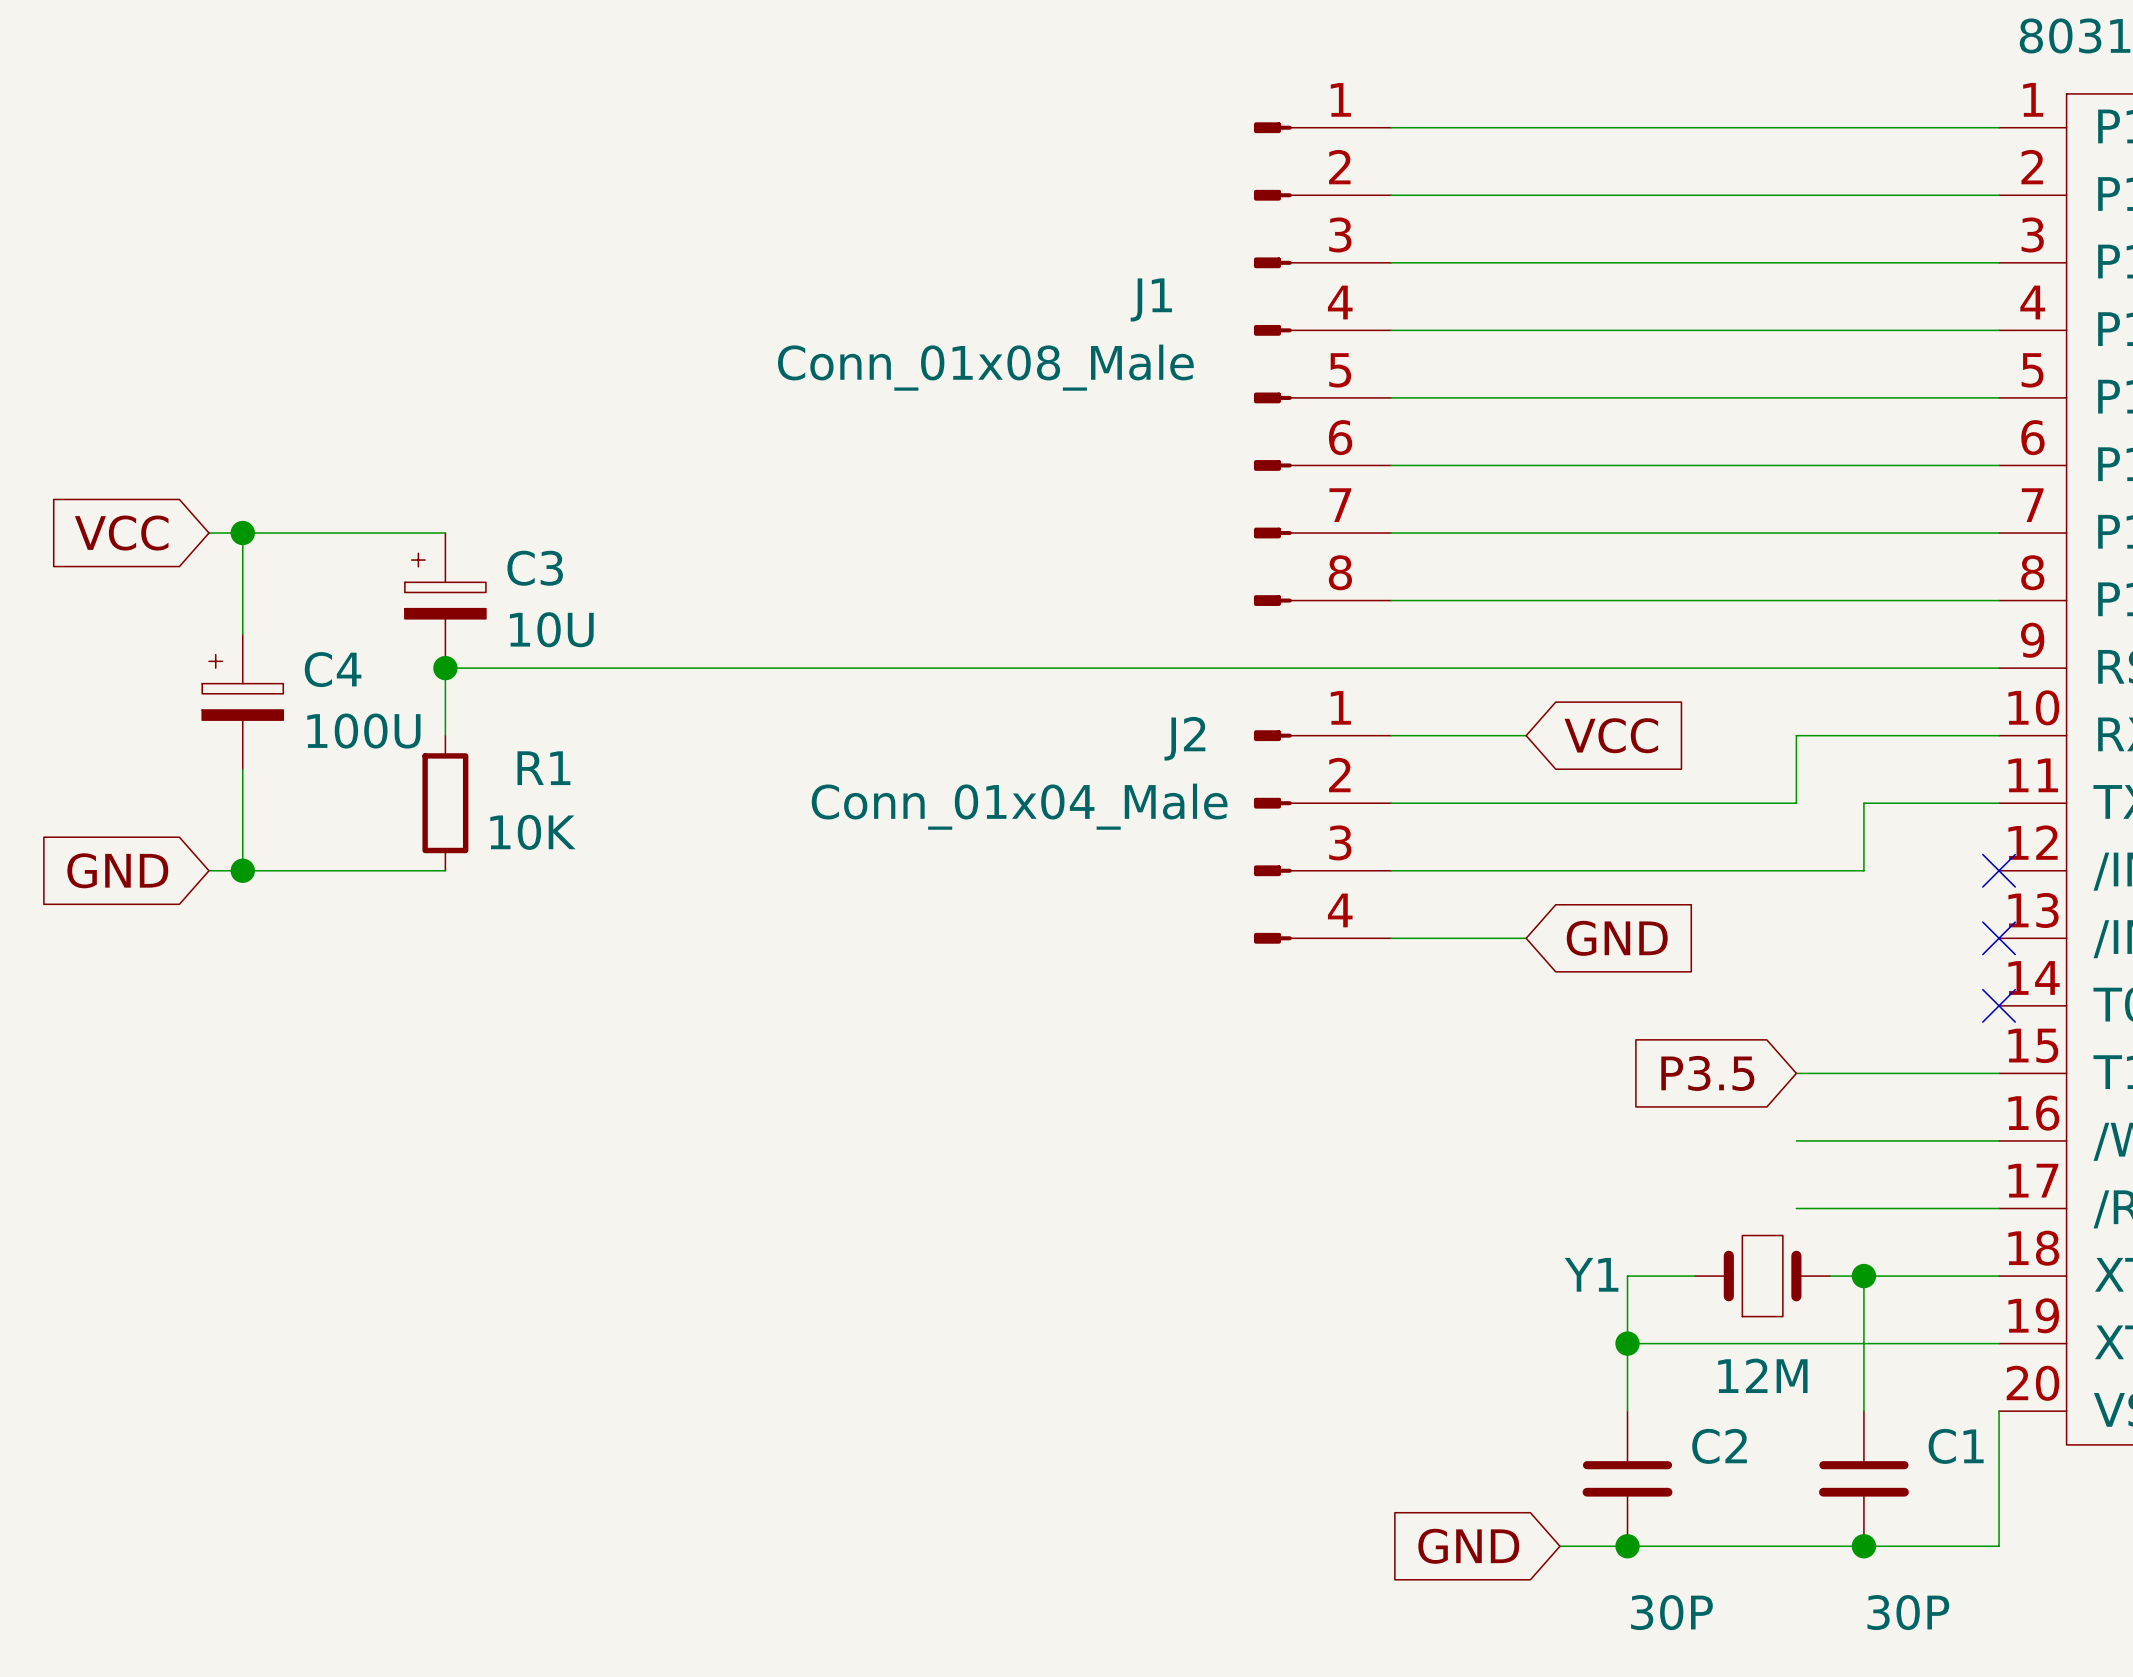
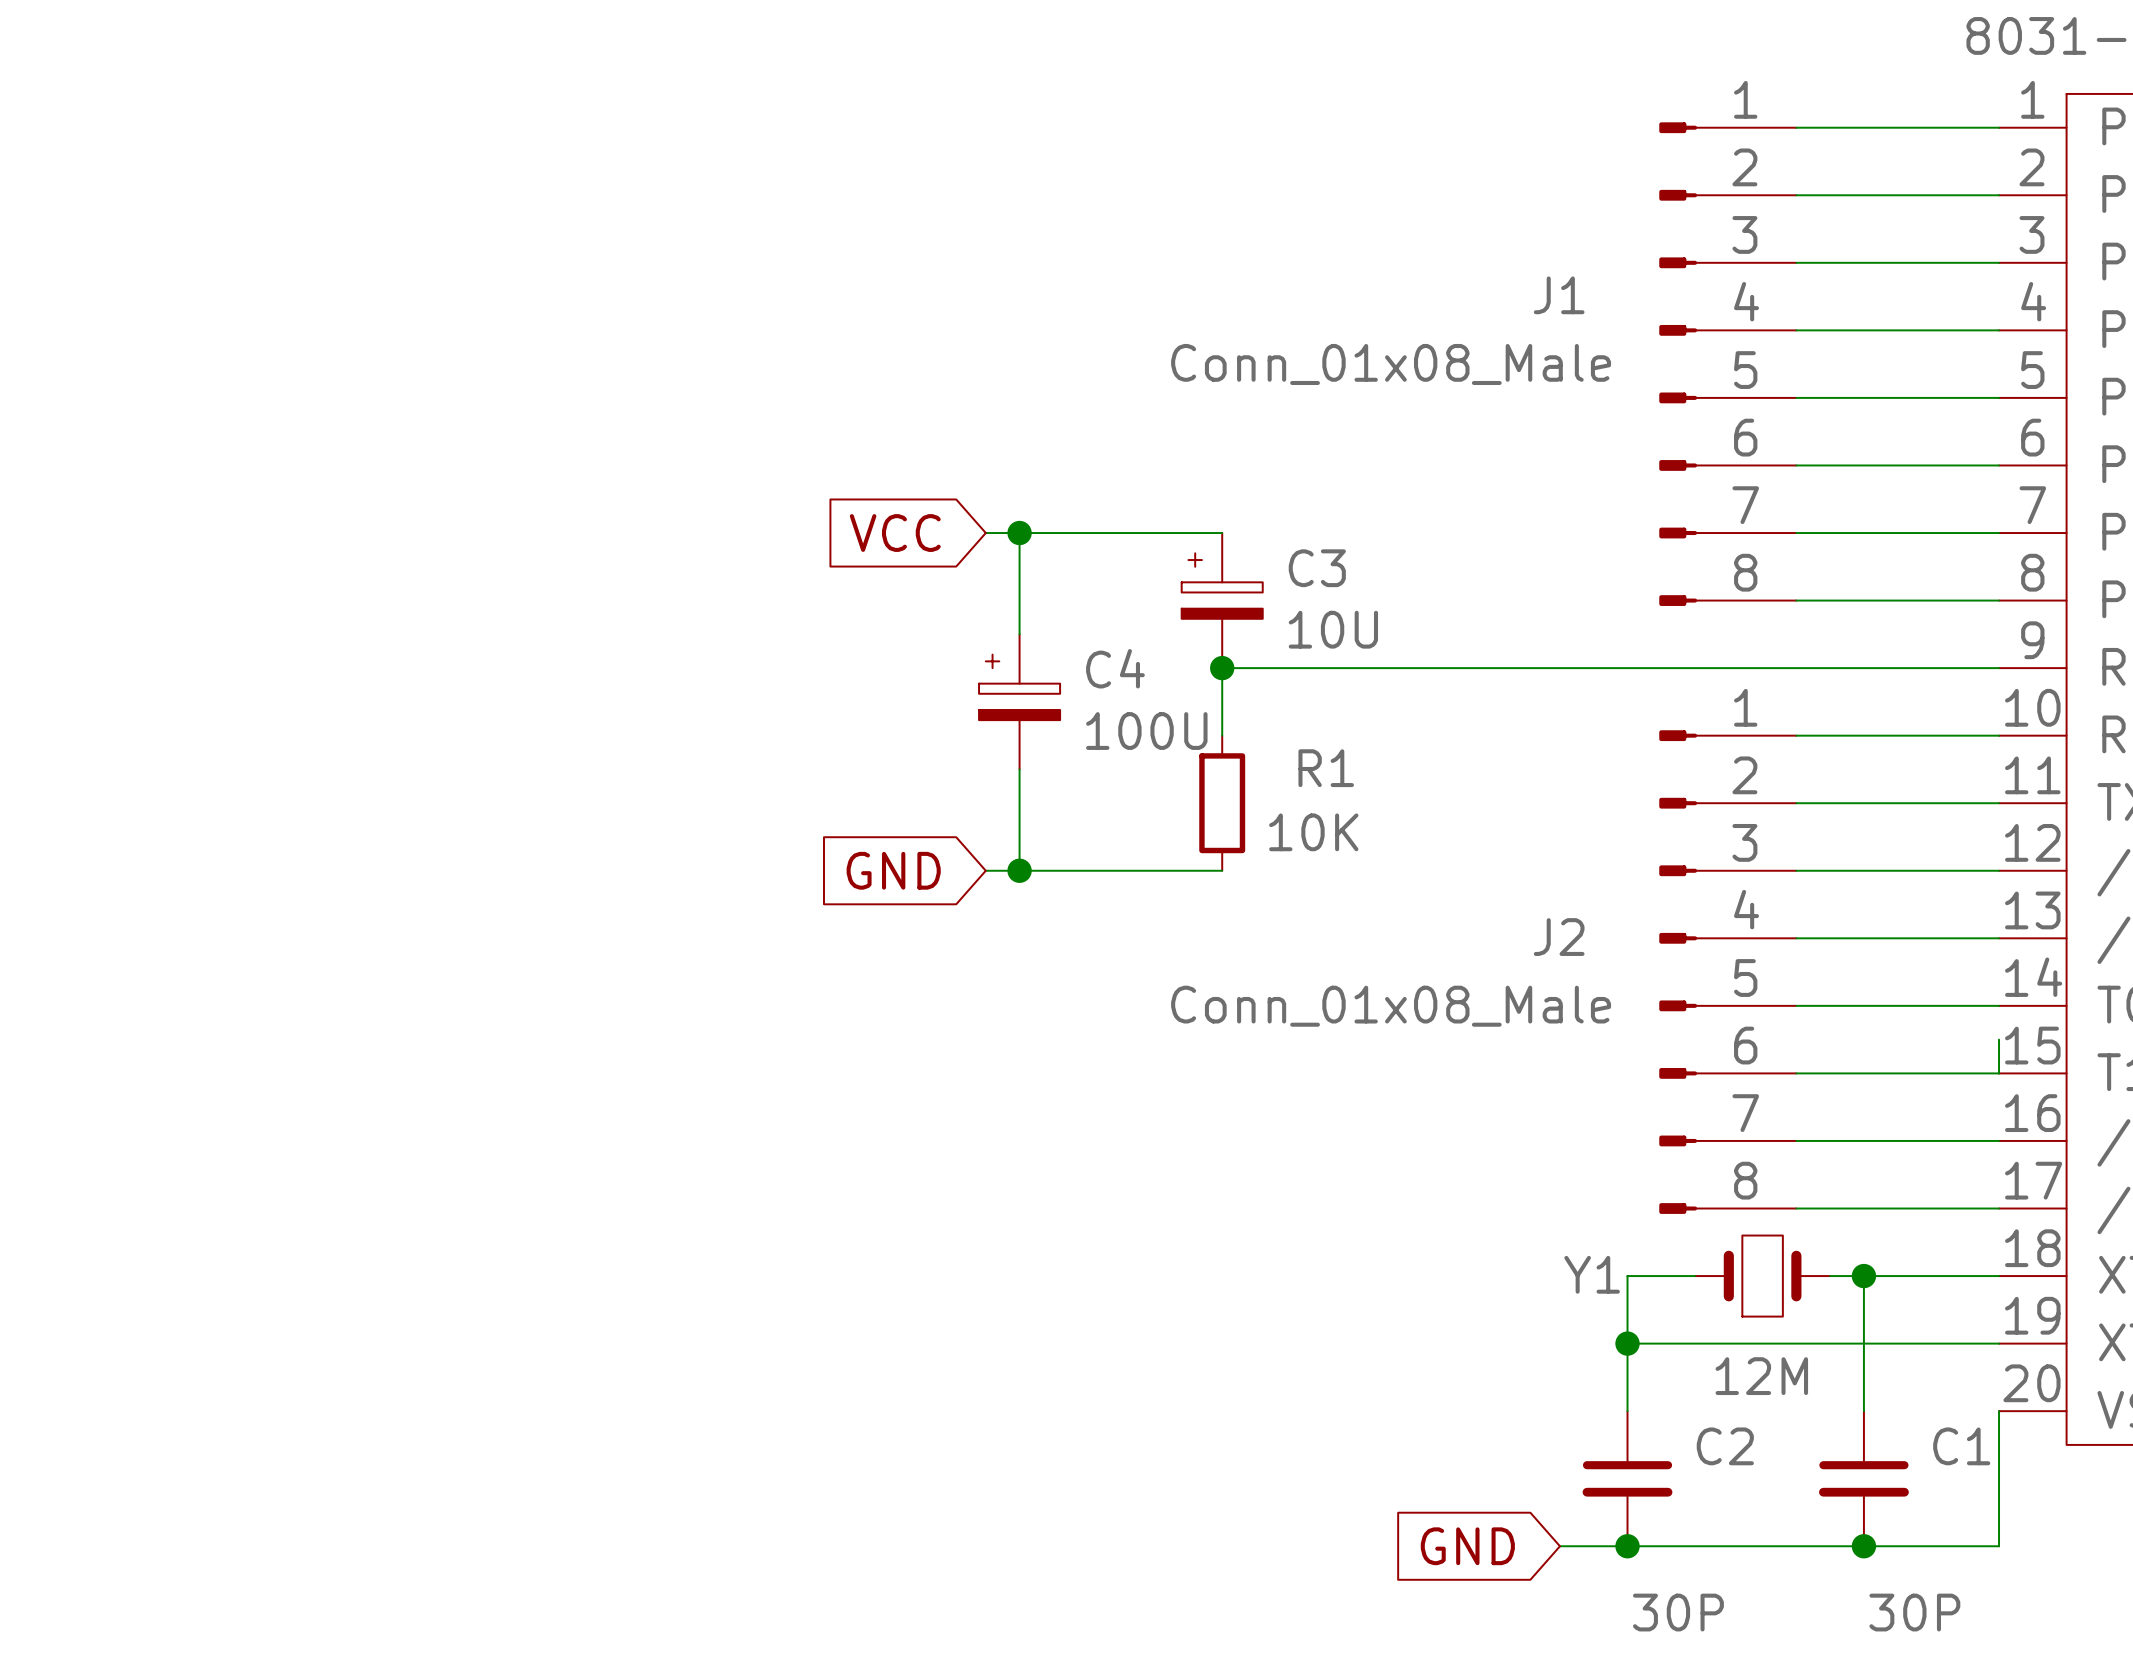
wire: (1391, 127) (1796, 127) -> none
wire: (1391, 195) (1796, 195) -> none
wire: (1391, 262) (1796, 262) -> none
wire: (1391, 330) (1796, 330) -> none
J1 position: (1322, 364) -> (1727, 364)
wire: (1391, 397) (1796, 397) -> none
wire: (1391, 465) (1796, 465) -> none
global label: VCC (121, 533) -> none
wire: (208, 533) (445, 533) -> none
wire: (242, 533) (242, 634) -> none
junction: (242, 533) -> none
global label: none -> VCC (895, 533)
wire: none -> (985, 533) (1222, 533)
wire: none -> (1019, 533) (1019, 634)
junction: none -> (1019, 533)
wire: (1391, 533) (1796, 533) -> none
C3 position: (445, 600) -> (1222, 600)
wire: (1391, 600) (1796, 600) -> none
junction: (445, 668) -> none
wire: (1222, 668) (445, 668) (445, 735) -> (1222, 668) (1222, 735)
junction: none -> (1222, 668)
C4 position: (242, 701) -> (1019, 701)
J2 symbol: [1253, 730, 1392, 944] -> [1659, 730, 1797, 1214]
wire: (1391, 735) (1526, 735) -> none
global label: VCC (1611, 735) -> none
wire: (1796, 735) (1796, 803) (1391, 803) -> none
J2 name position: J2 (1184, 738) -> J2 (1559, 937)
wire: (242, 769) (242, 870) -> none
wire: none -> (1019, 769) (1019, 870)
R1 position: (445, 803) -> (1222, 803)
wire: (1863, 803) (1863, 870) -> (1863, 803) (1796, 803)
J2 value: Conn_01x04_Male (1019, 806) -> Conn_01x08_Male (1391, 1006)
global label: GND (117, 870) -> none
wire: (208, 870) (445, 870) -> none
junction: (242, 870) -> none
global label: none -> GND (893, 870)
wire: none -> (985, 870) (1222, 870)
junction: none -> (1019, 870)
wire: (1391, 870) (1796, 870) -> none
no-connect mark: (1999, 870) -> none
wire: (1391, 938) (1526, 938) -> (1863, 870) (1999, 870)
global label: GND (1617, 938) -> none
wire: none -> (1796, 938) (1999, 938)
no-connect mark: (1999, 938) -> none
wire: none -> (1796, 1005) (1999, 1005)
no-connect mark: (1999, 1005) -> none
wire: none -> (1999, 1039) (1999, 1073)
global label: P3.5 (1707, 1073) -> none

